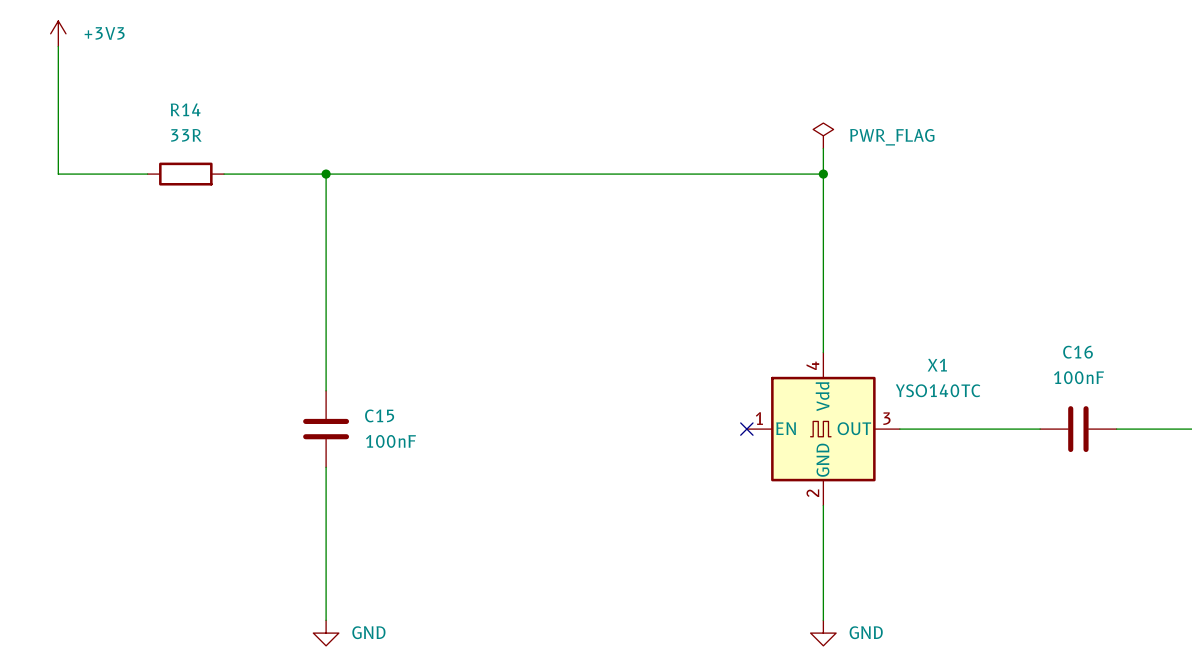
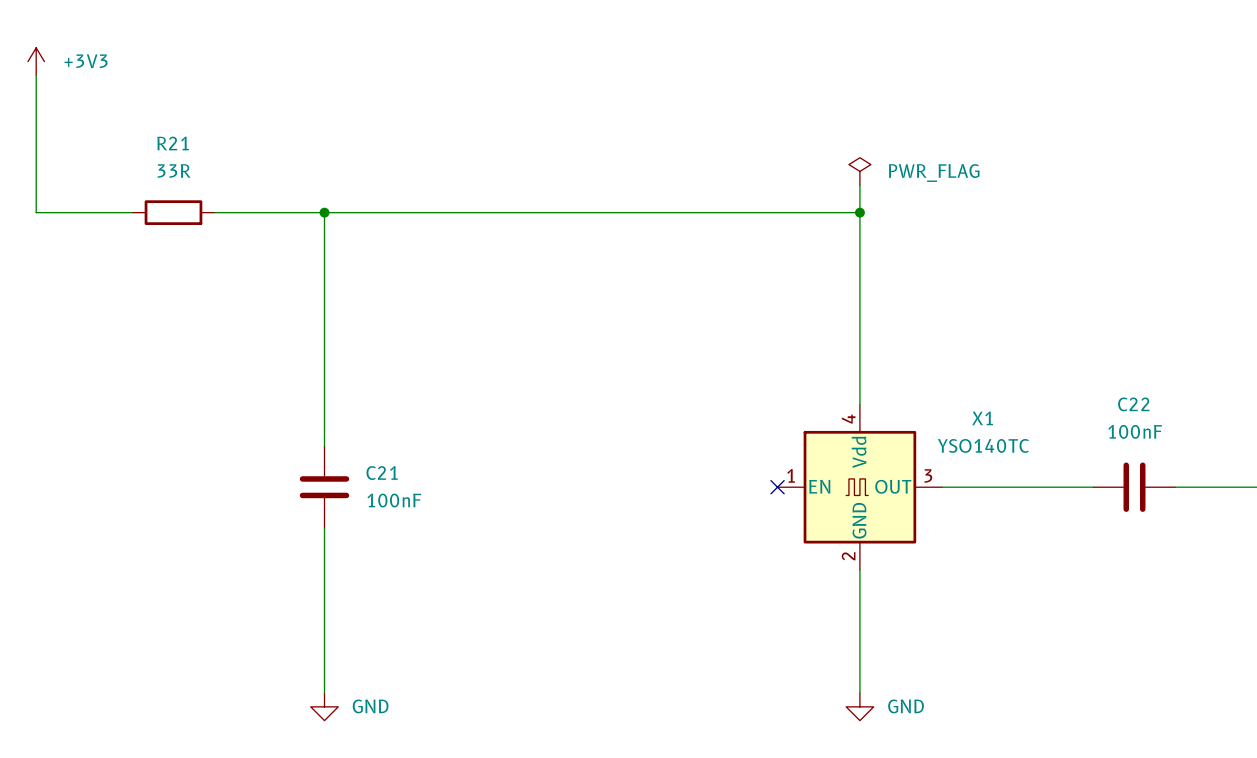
R14 name: R14 (185, 109) -> R21 (173, 143)
C16 name: C16 (1078, 352) -> C22 (1133, 404)
C15 name: C15 (379, 415) -> C21 (382, 473)

